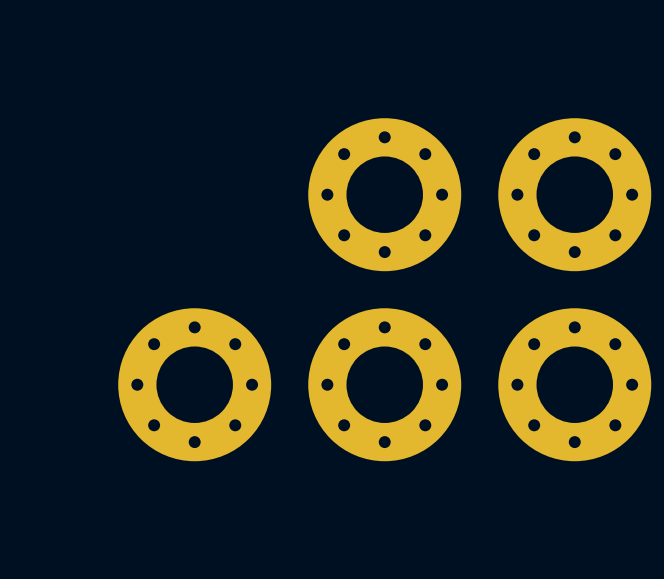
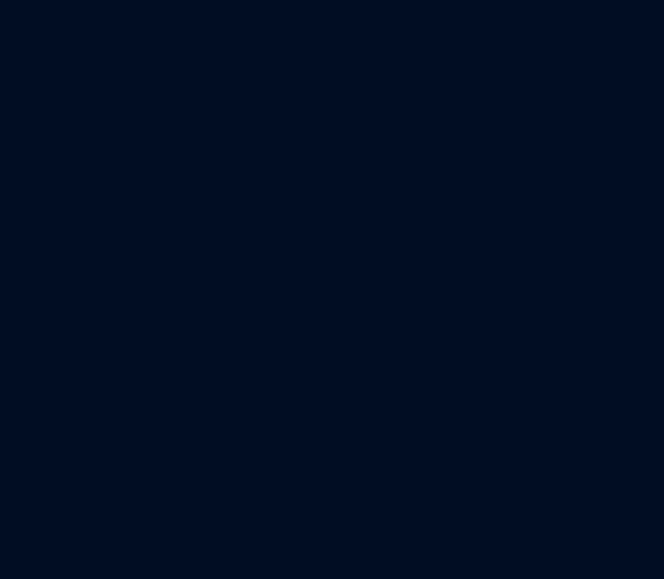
part: (384, 194) -> none
part: (574, 194) -> none
part: (194, 384) -> none
part: (384, 384) -> none
part: (574, 384) -> none

